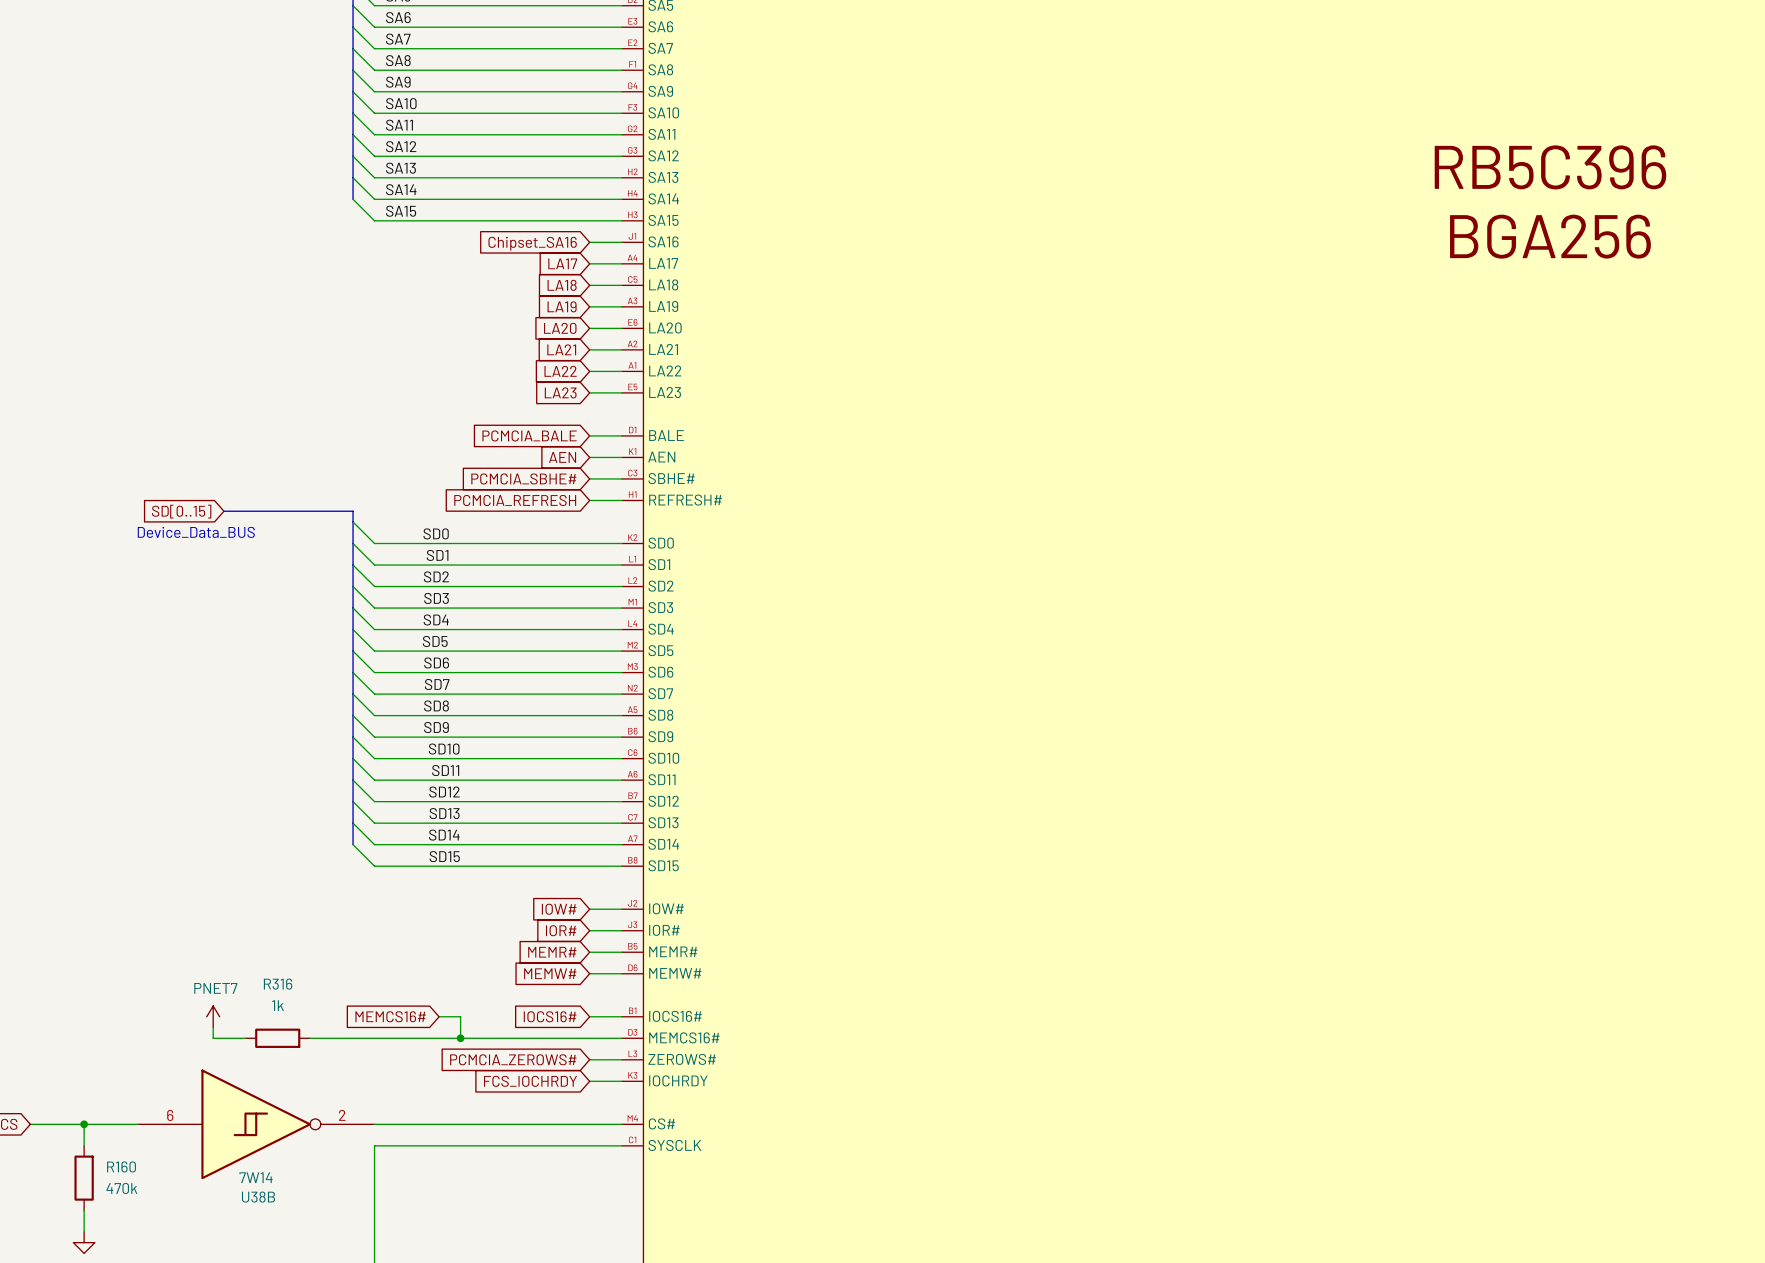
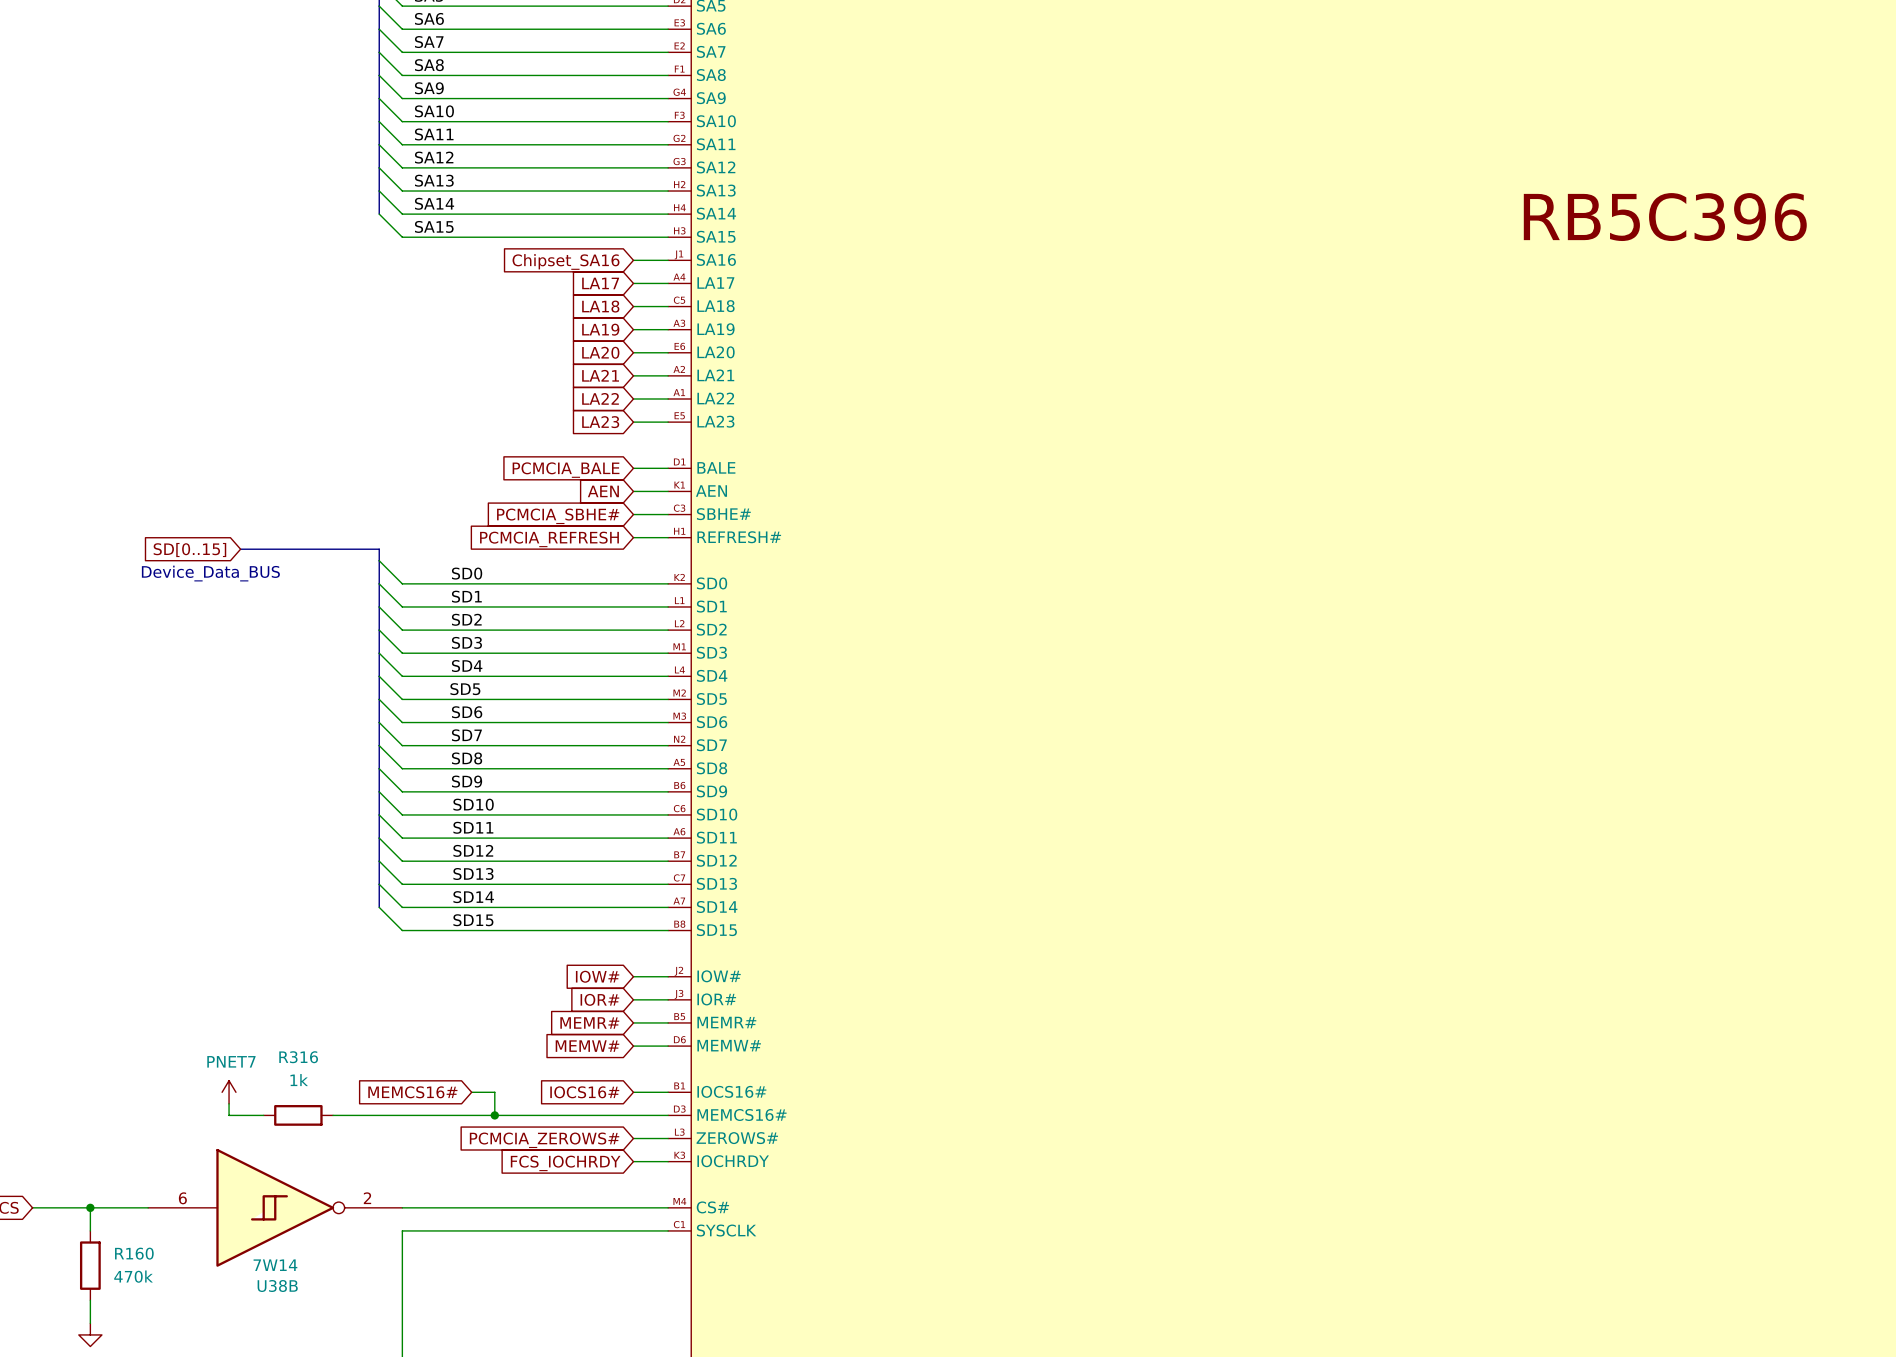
part text position: RB5C396 (1550, 167) -> RB5C396 (1665, 217)
part text: BGA256 (1550, 236) -> none

